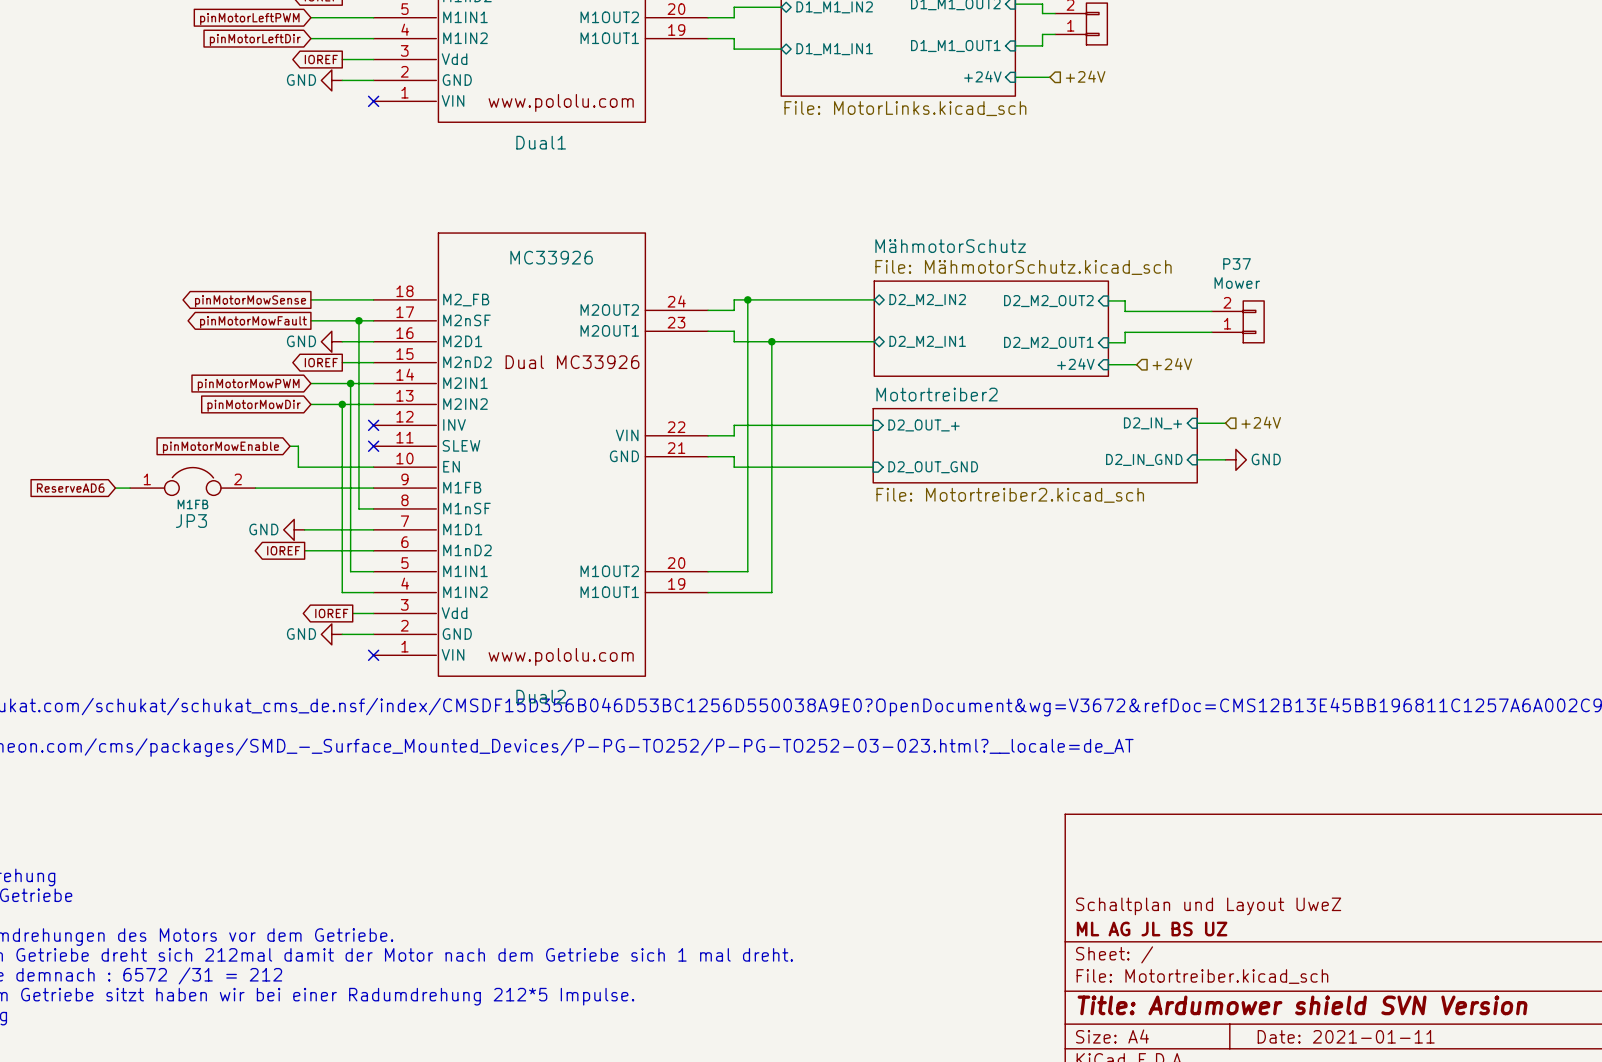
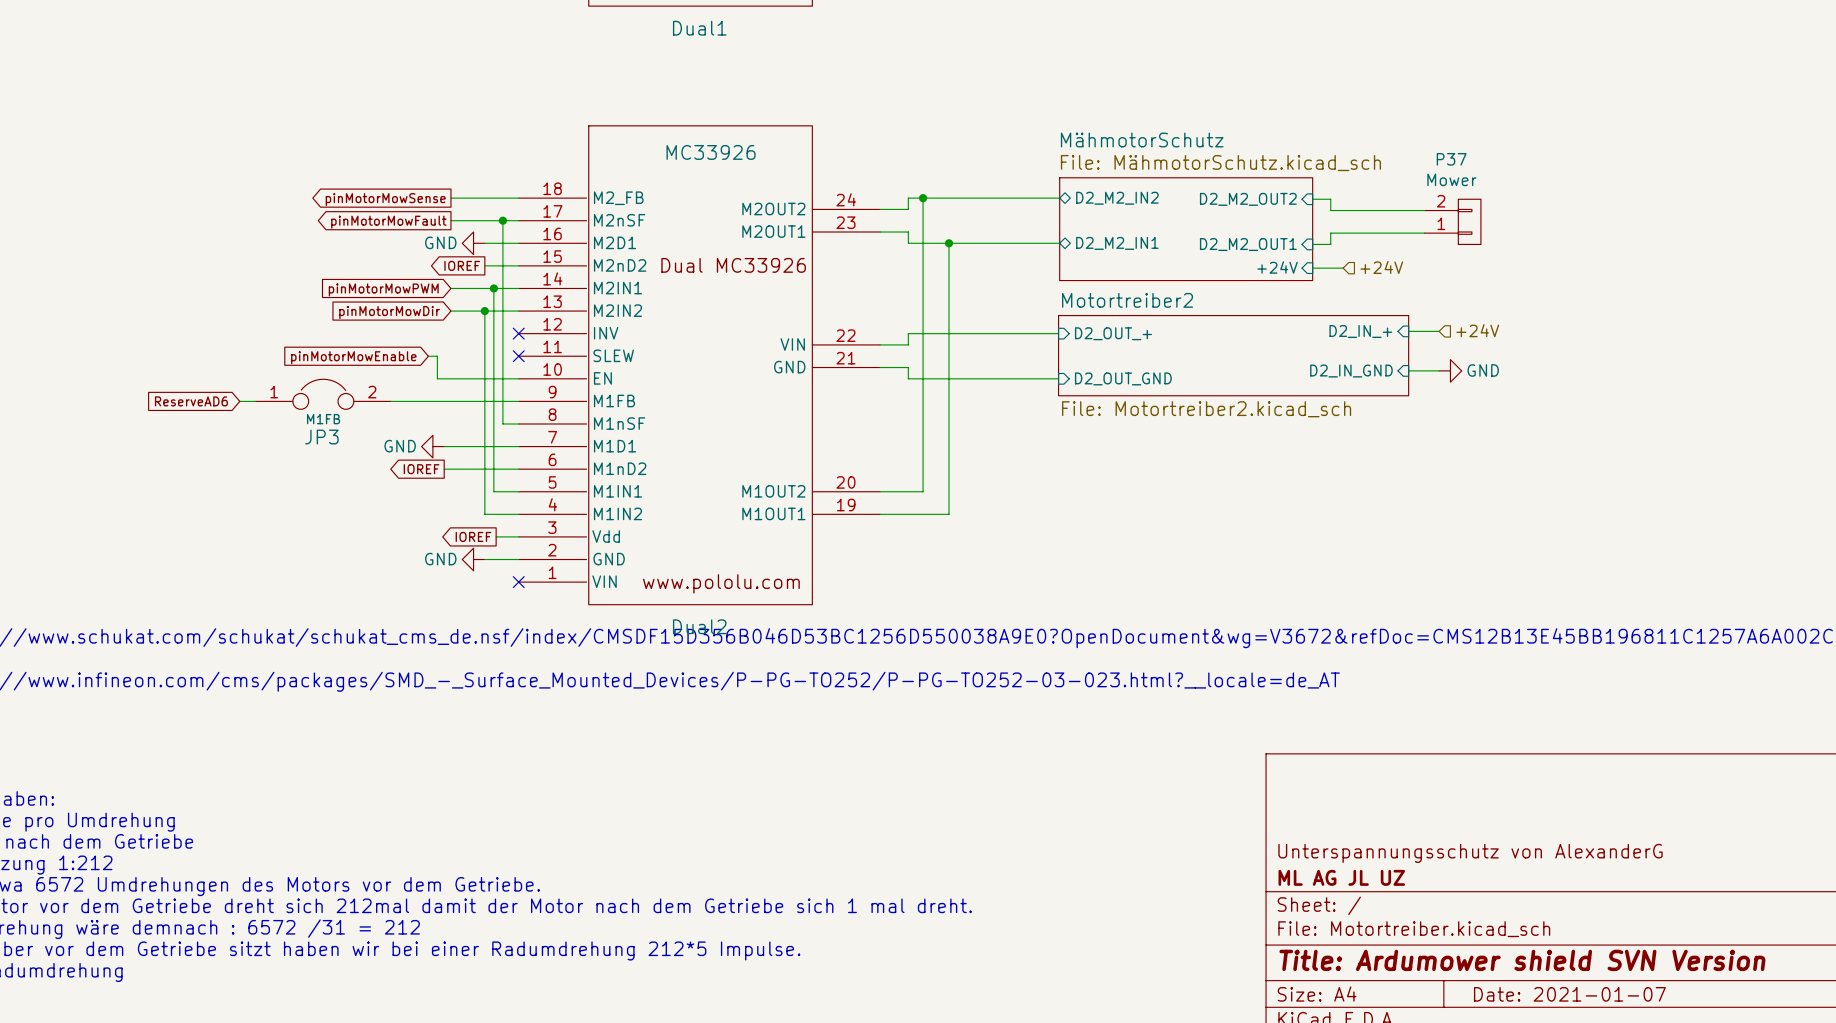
title block: Schaltplan und Layout UweZ (1208, 906) -> Unterspannungsschutz von AlexanderG (1470, 853)
title block: ML AG JL BS UZ (1152, 929) -> ML AG JL UZ (1341, 877)
title block: Date: 2021-01-11 (1346, 1036) -> Date: 2021-01-07 (1569, 994)

